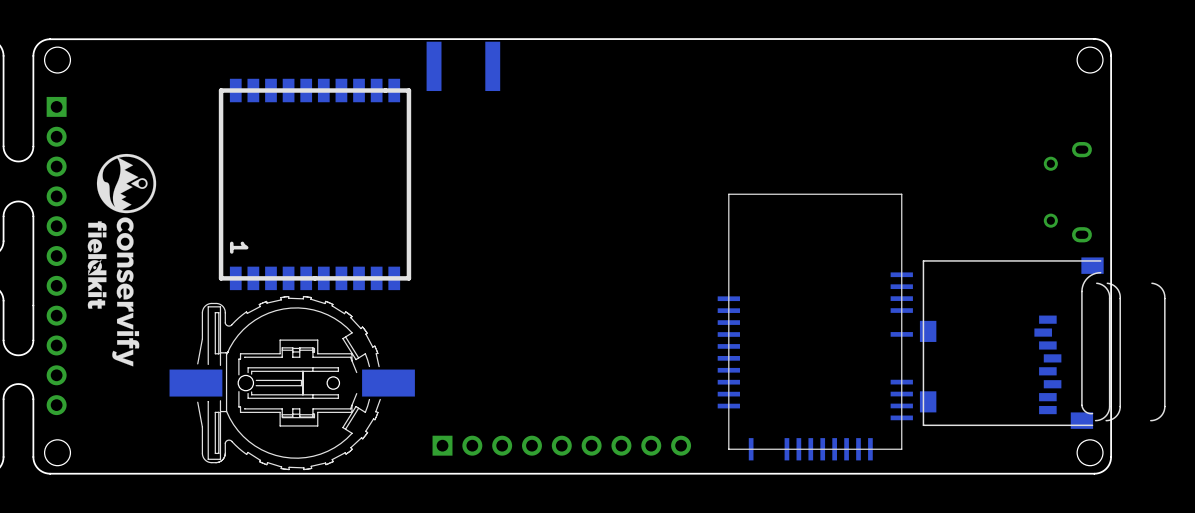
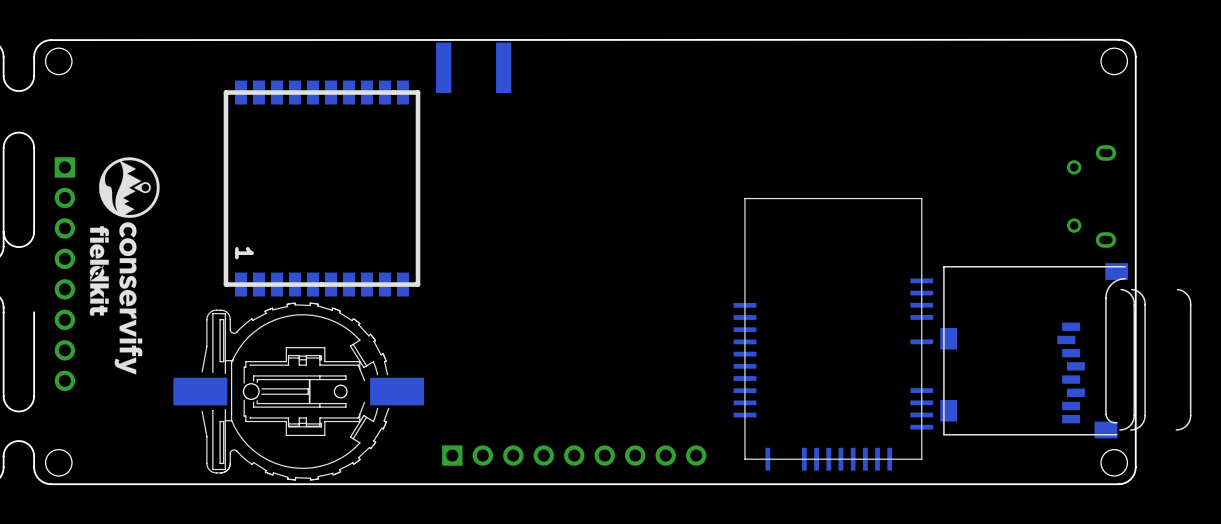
board edge: (3, 74) (3, 144) -> (34, 147) (29, 137) (18, 132) (8, 137) (3, 147)
board edge: (33, 74) (33, 144) -> (34, 75) (29, 86) (18, 91) (8, 86) (3, 75)
board edge: (3, 146) (8, 157) (18, 161) (28, 157) (33, 146) -> (3, 149) (3, 221)
board edge: (33, 216) (29, 205) (18, 201) (7, 205) (3, 216) -> (34, 221) (34, 149)
board edge: (33, 226) (33, 305) -> (34, 231) (29, 242) (18, 247) (8, 242) (3, 231)
part: (56, 256) -> none
part: none -> (64, 274)
board edge: (33, 340) (29, 350) (18, 355) (7, 350) (3, 340) -> (3, 396) (3, 347)
board edge: none -> (34, 347) (34, 396)
board edge: none -> (34, 396) (29, 407) (18, 411) (8, 407) (3, 396)
board edge: (33, 446) (32, 395) (28, 387) (18, 384) (9, 386) (3, 395) (3, 446) -> (34, 456) (29, 445) (18, 441) (8, 445) (3, 456)

